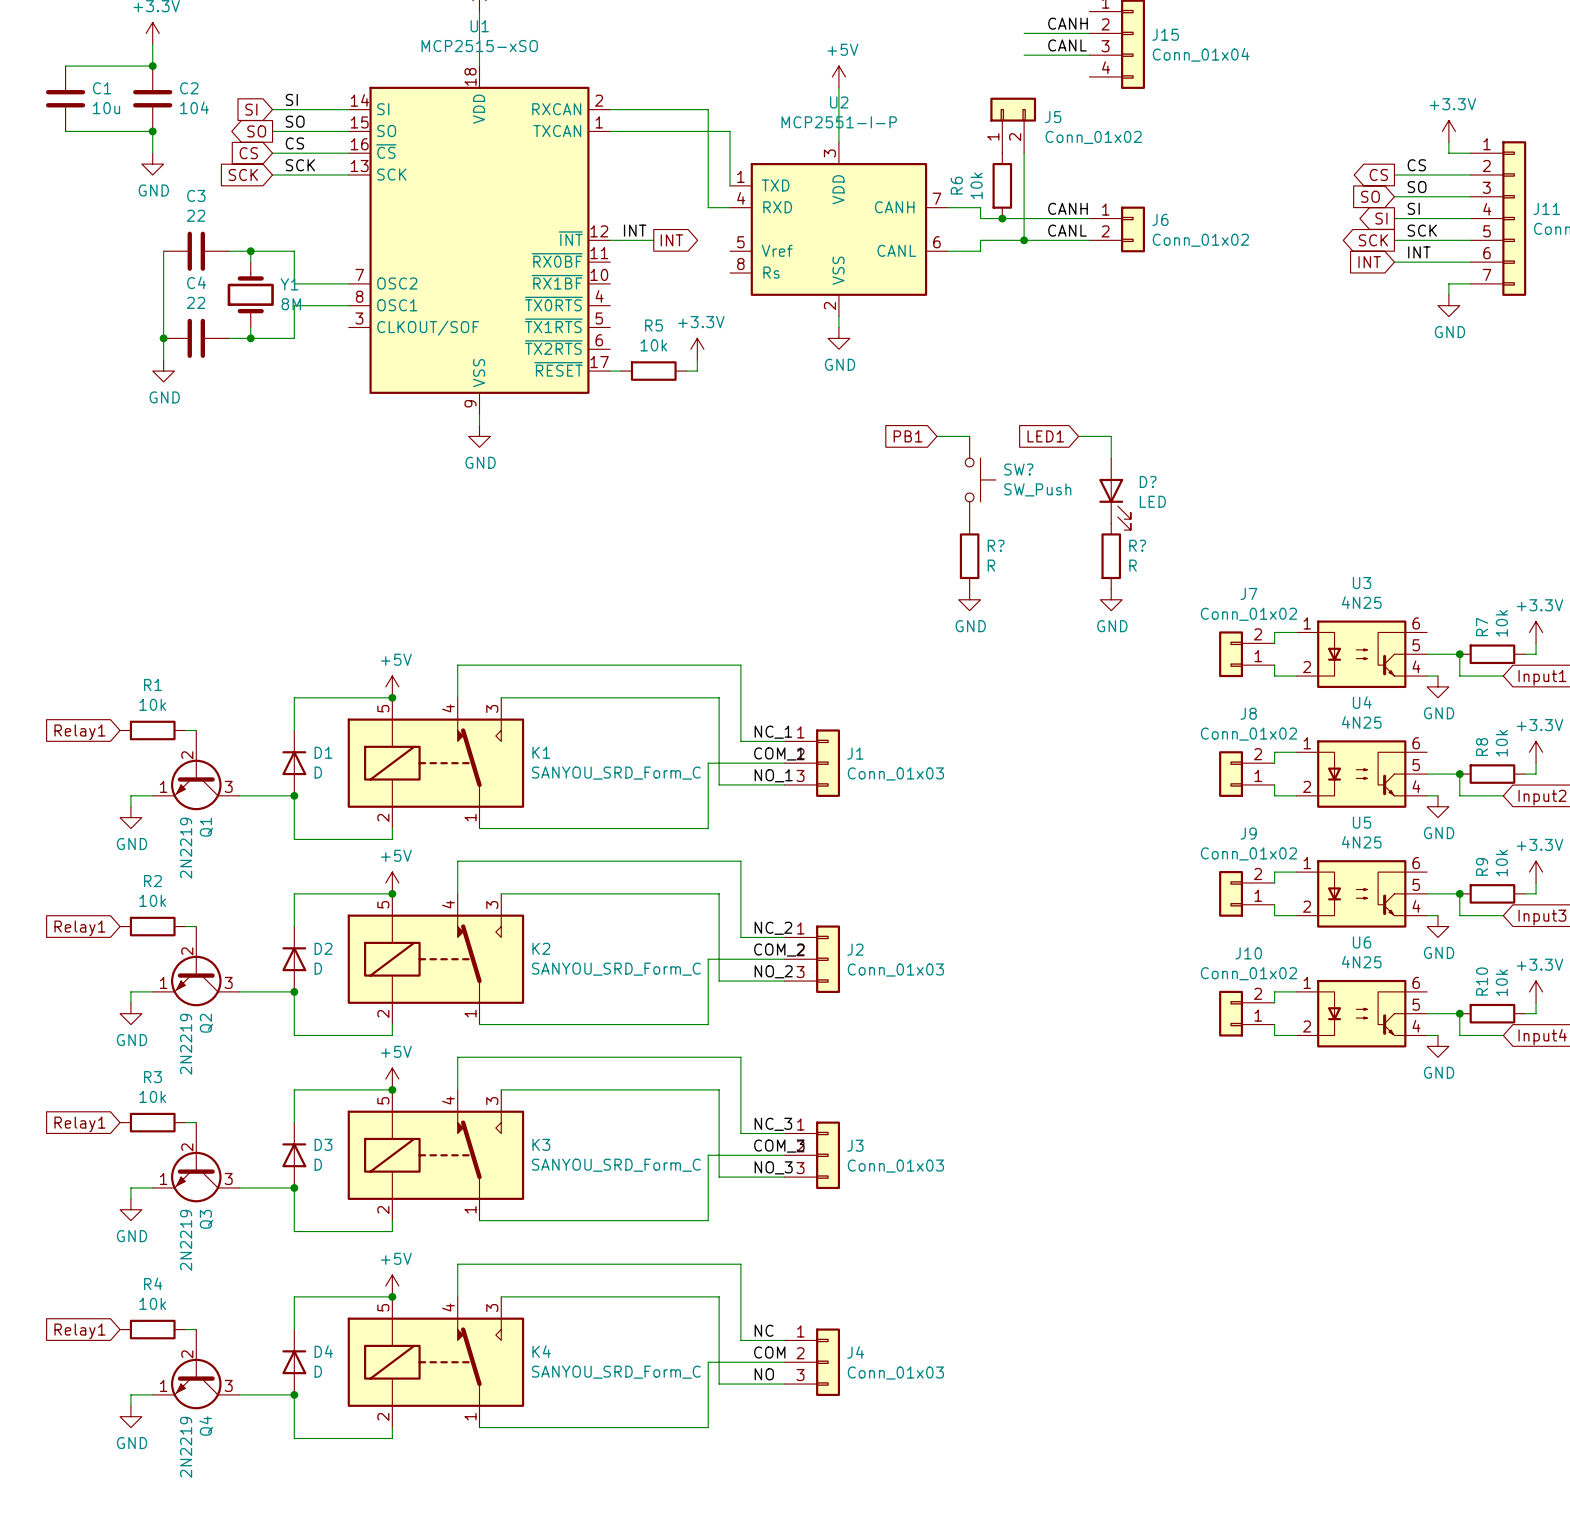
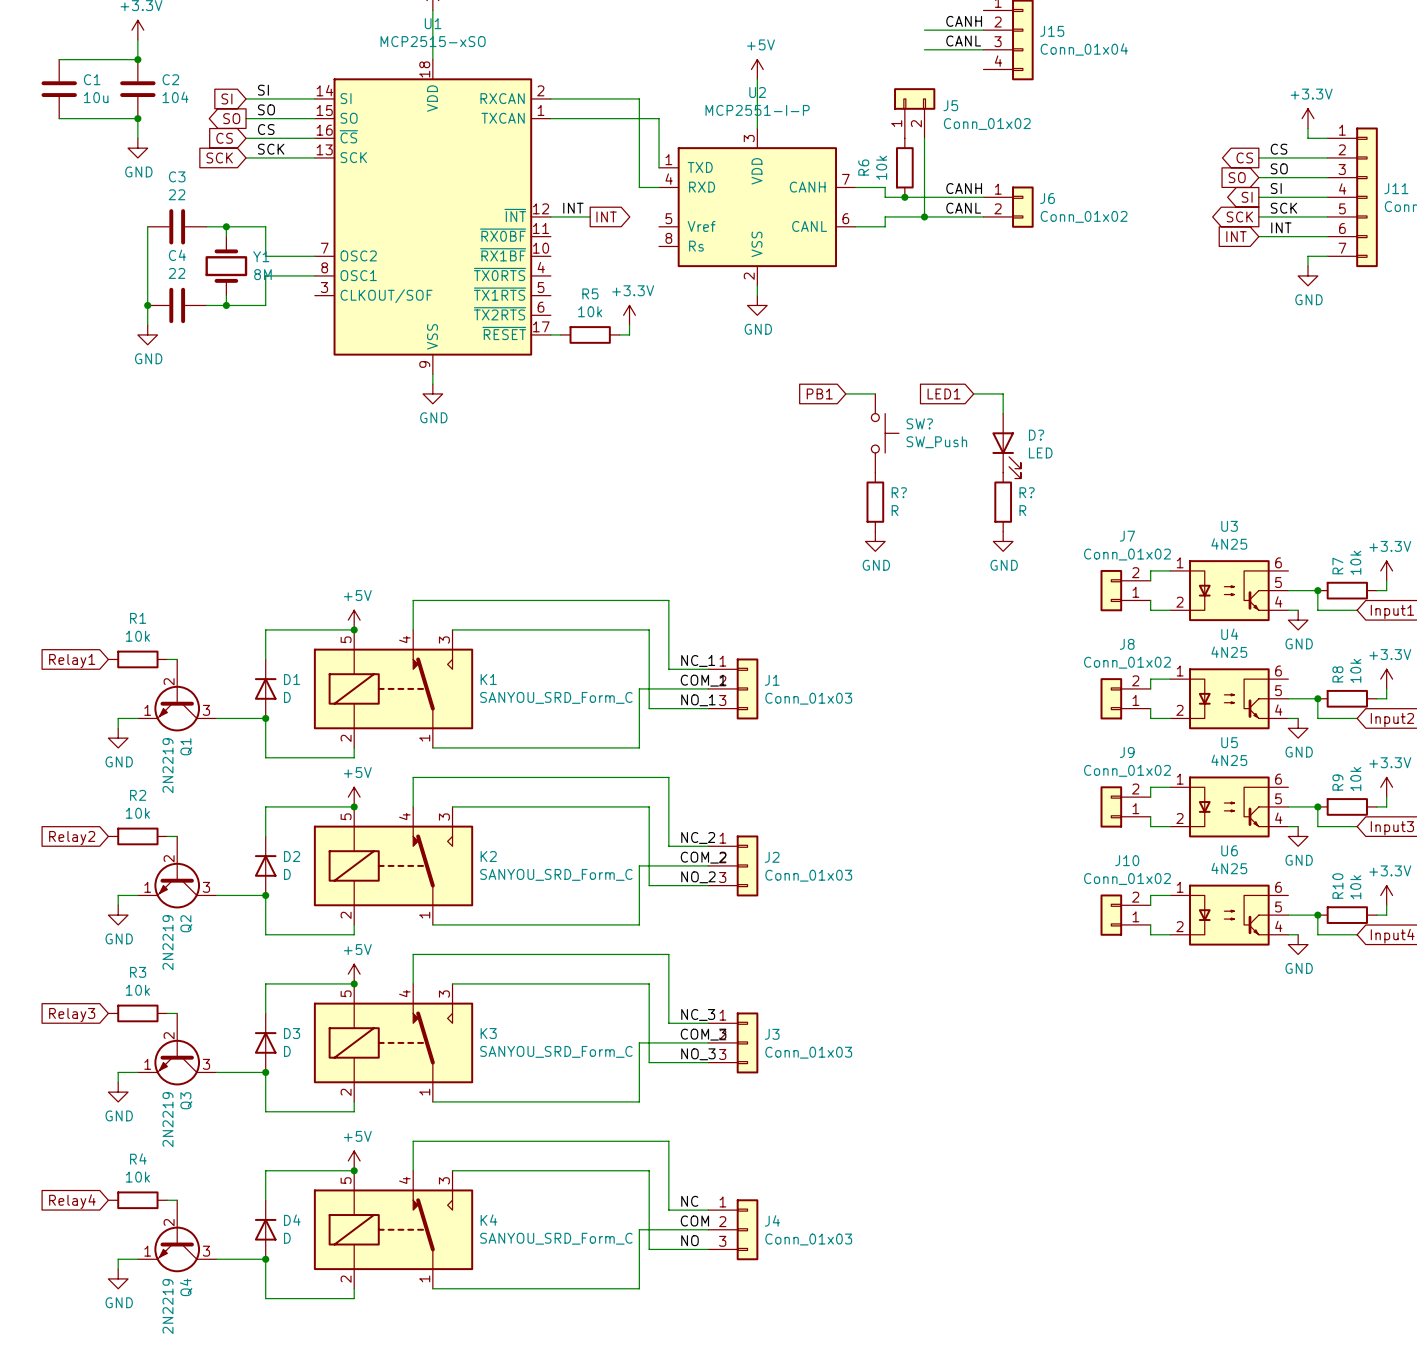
global label: Relay1 (79, 928) -> Relay2 (72, 838)
global label: Relay1 (79, 1124) -> Relay3 (72, 1015)
global label: Relay1 (79, 1331) -> Relay4 (72, 1201)

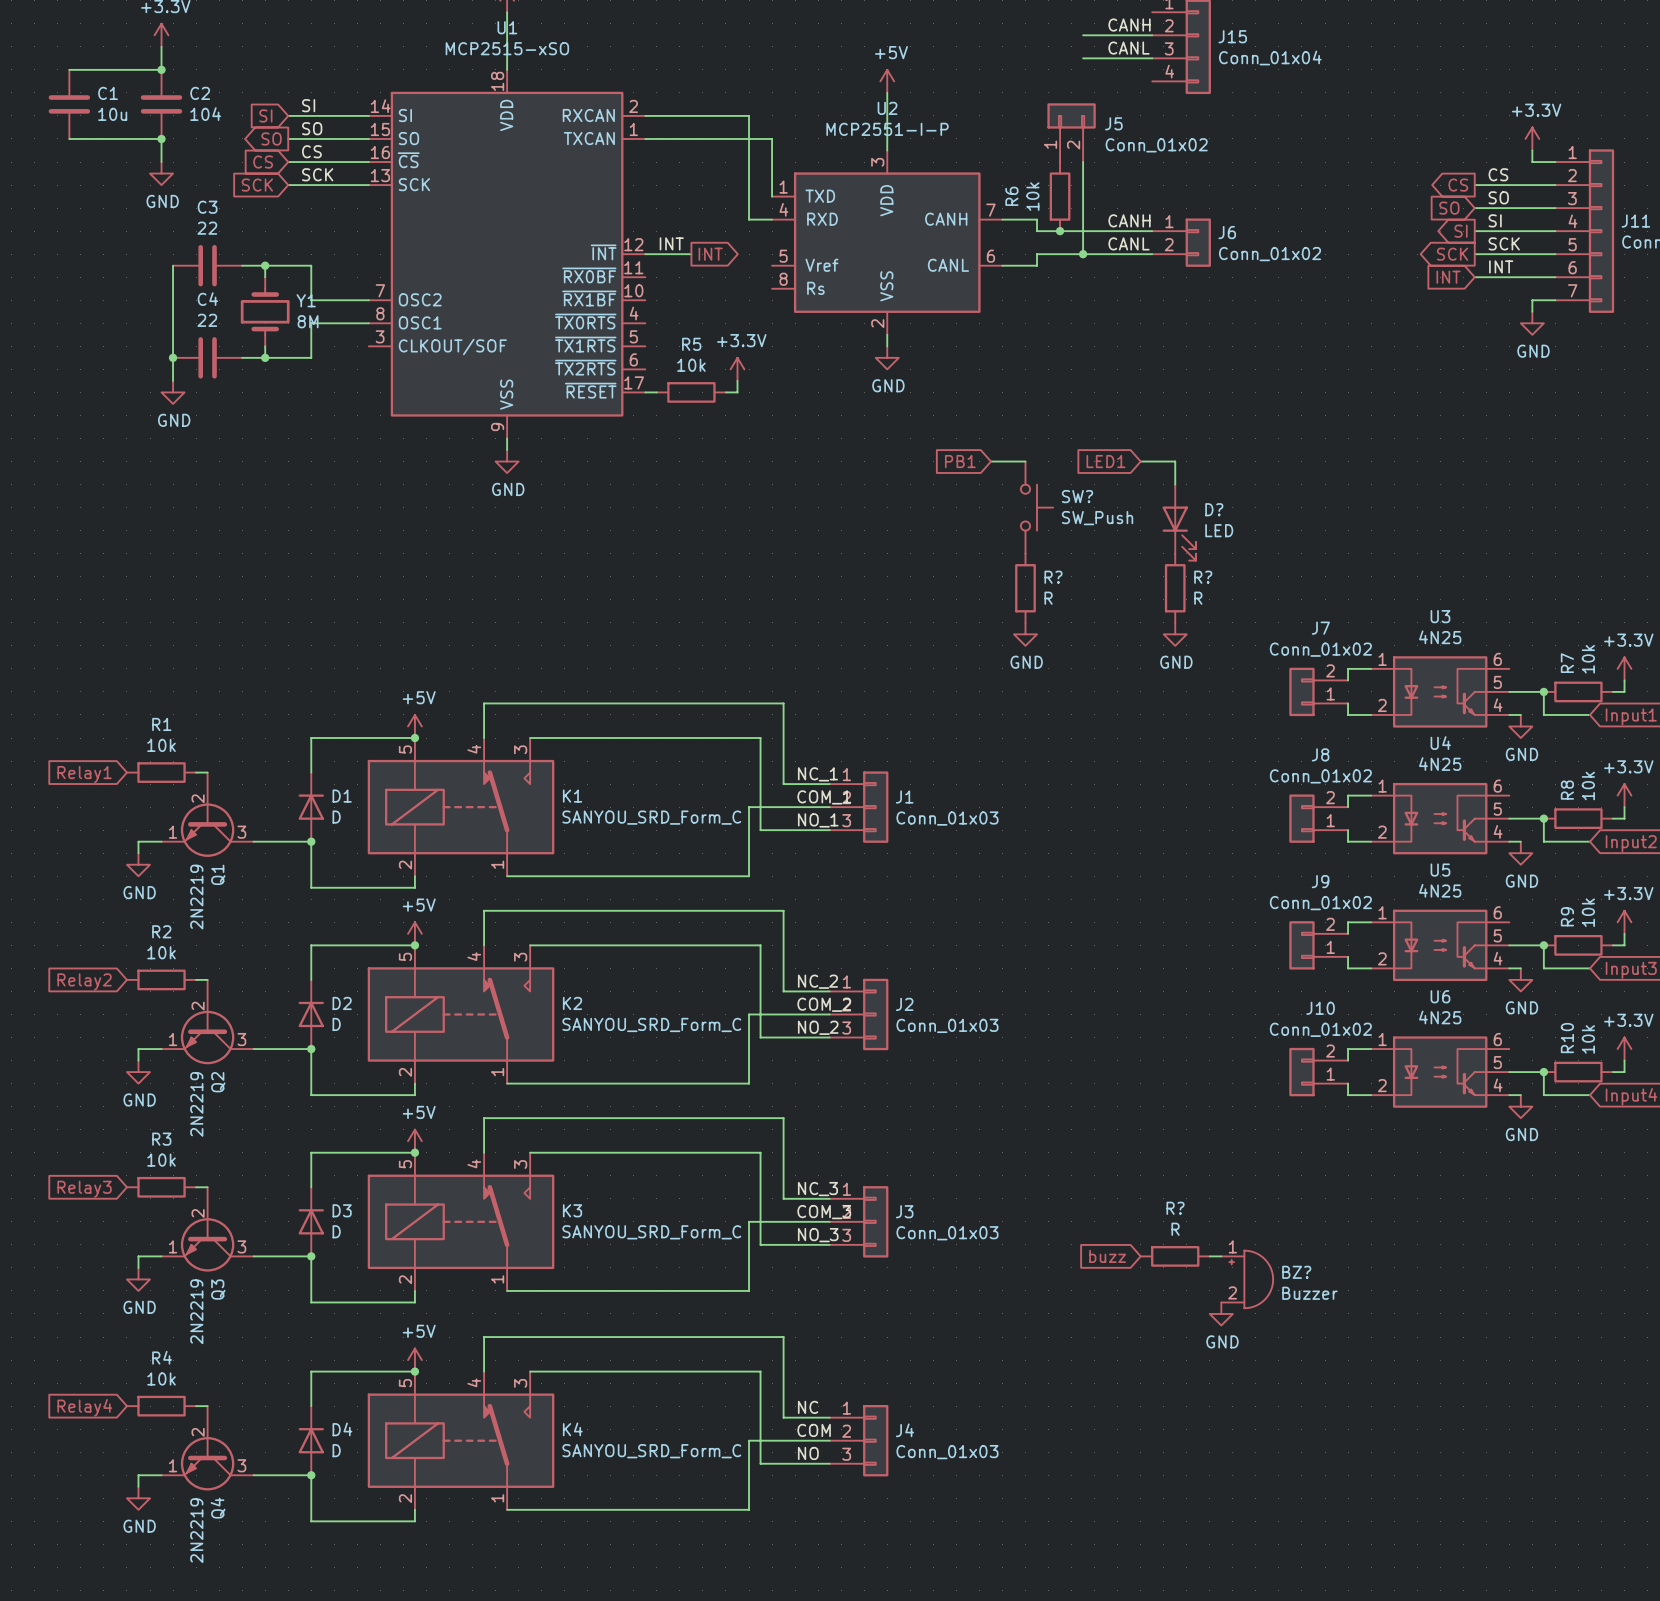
global label: none -> buzz (1107, 1256)
R?: none -> R (1175, 1256)
wire: none -> (1209, 1256) (1221, 1256)
BZ?: none -> Buzzer (1247, 1279)
power symbol: none -> GND (1221, 1313)

